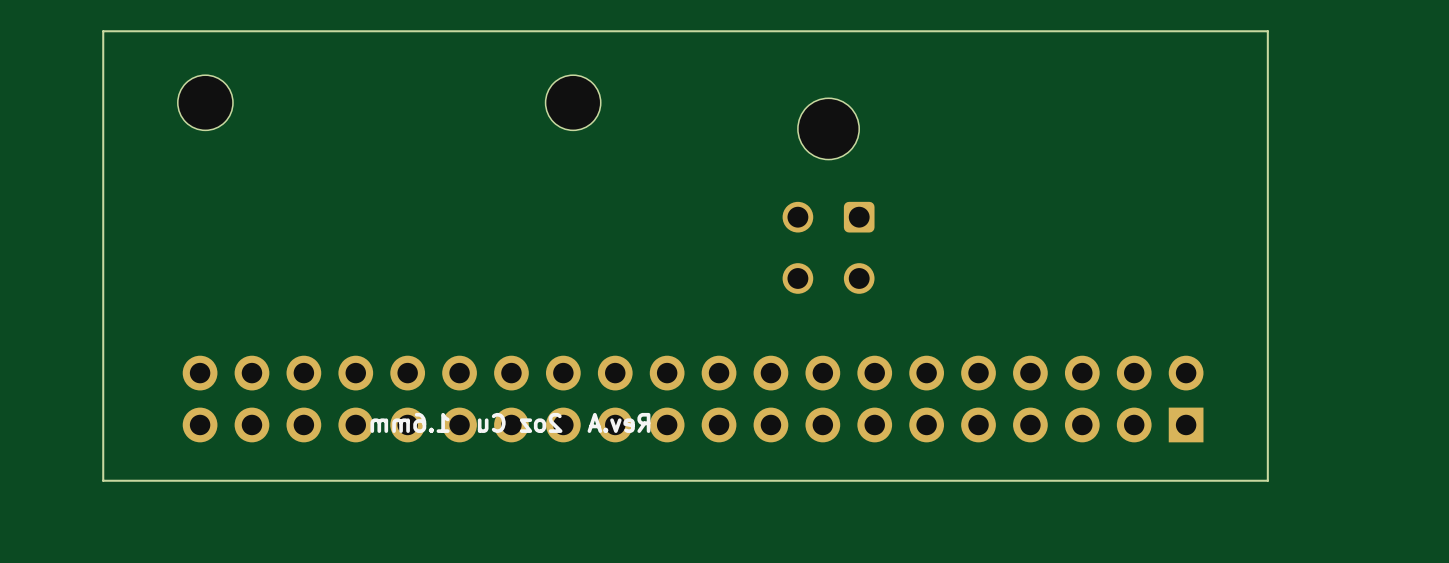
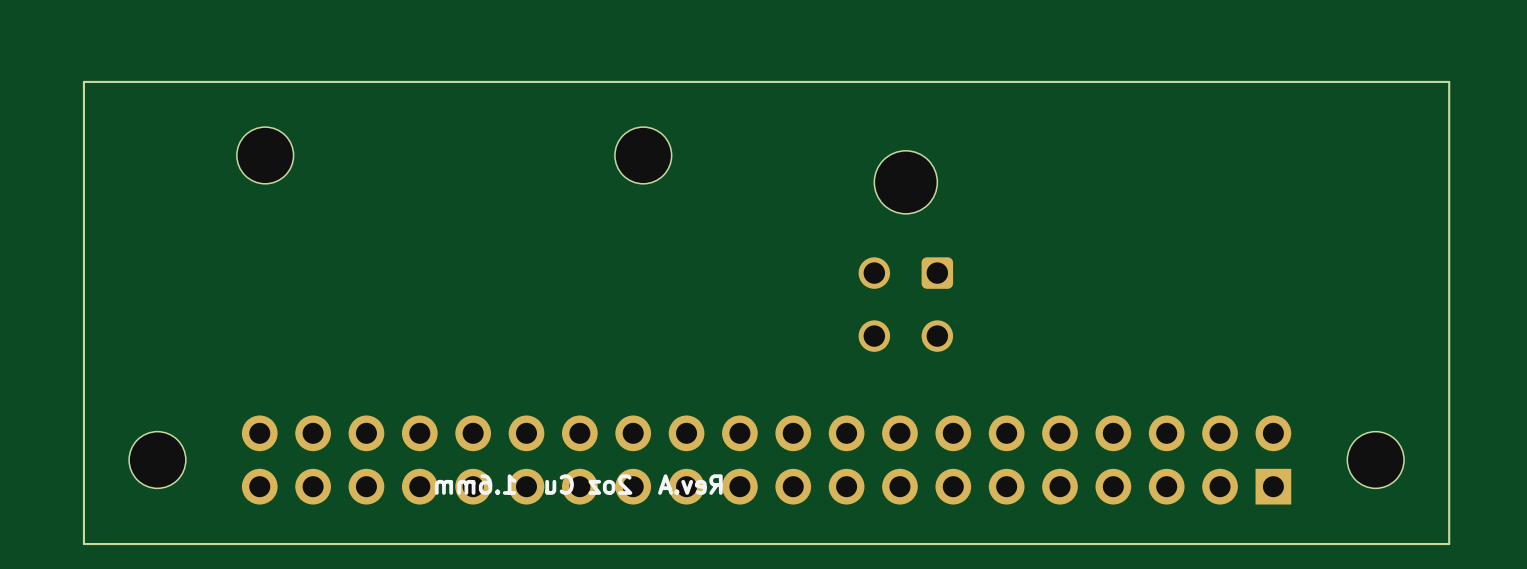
board edge: (103, 31) (103, 480) -> (160, 81) (83, 81) (83, 544) (160, 544)
board edge: (1267, 31) (1267, 480) -> (1357, 81) (1449, 81) (1449, 544) (1357, 544)
part: none -> (157, 460)
part: none -> (1375, 460)

